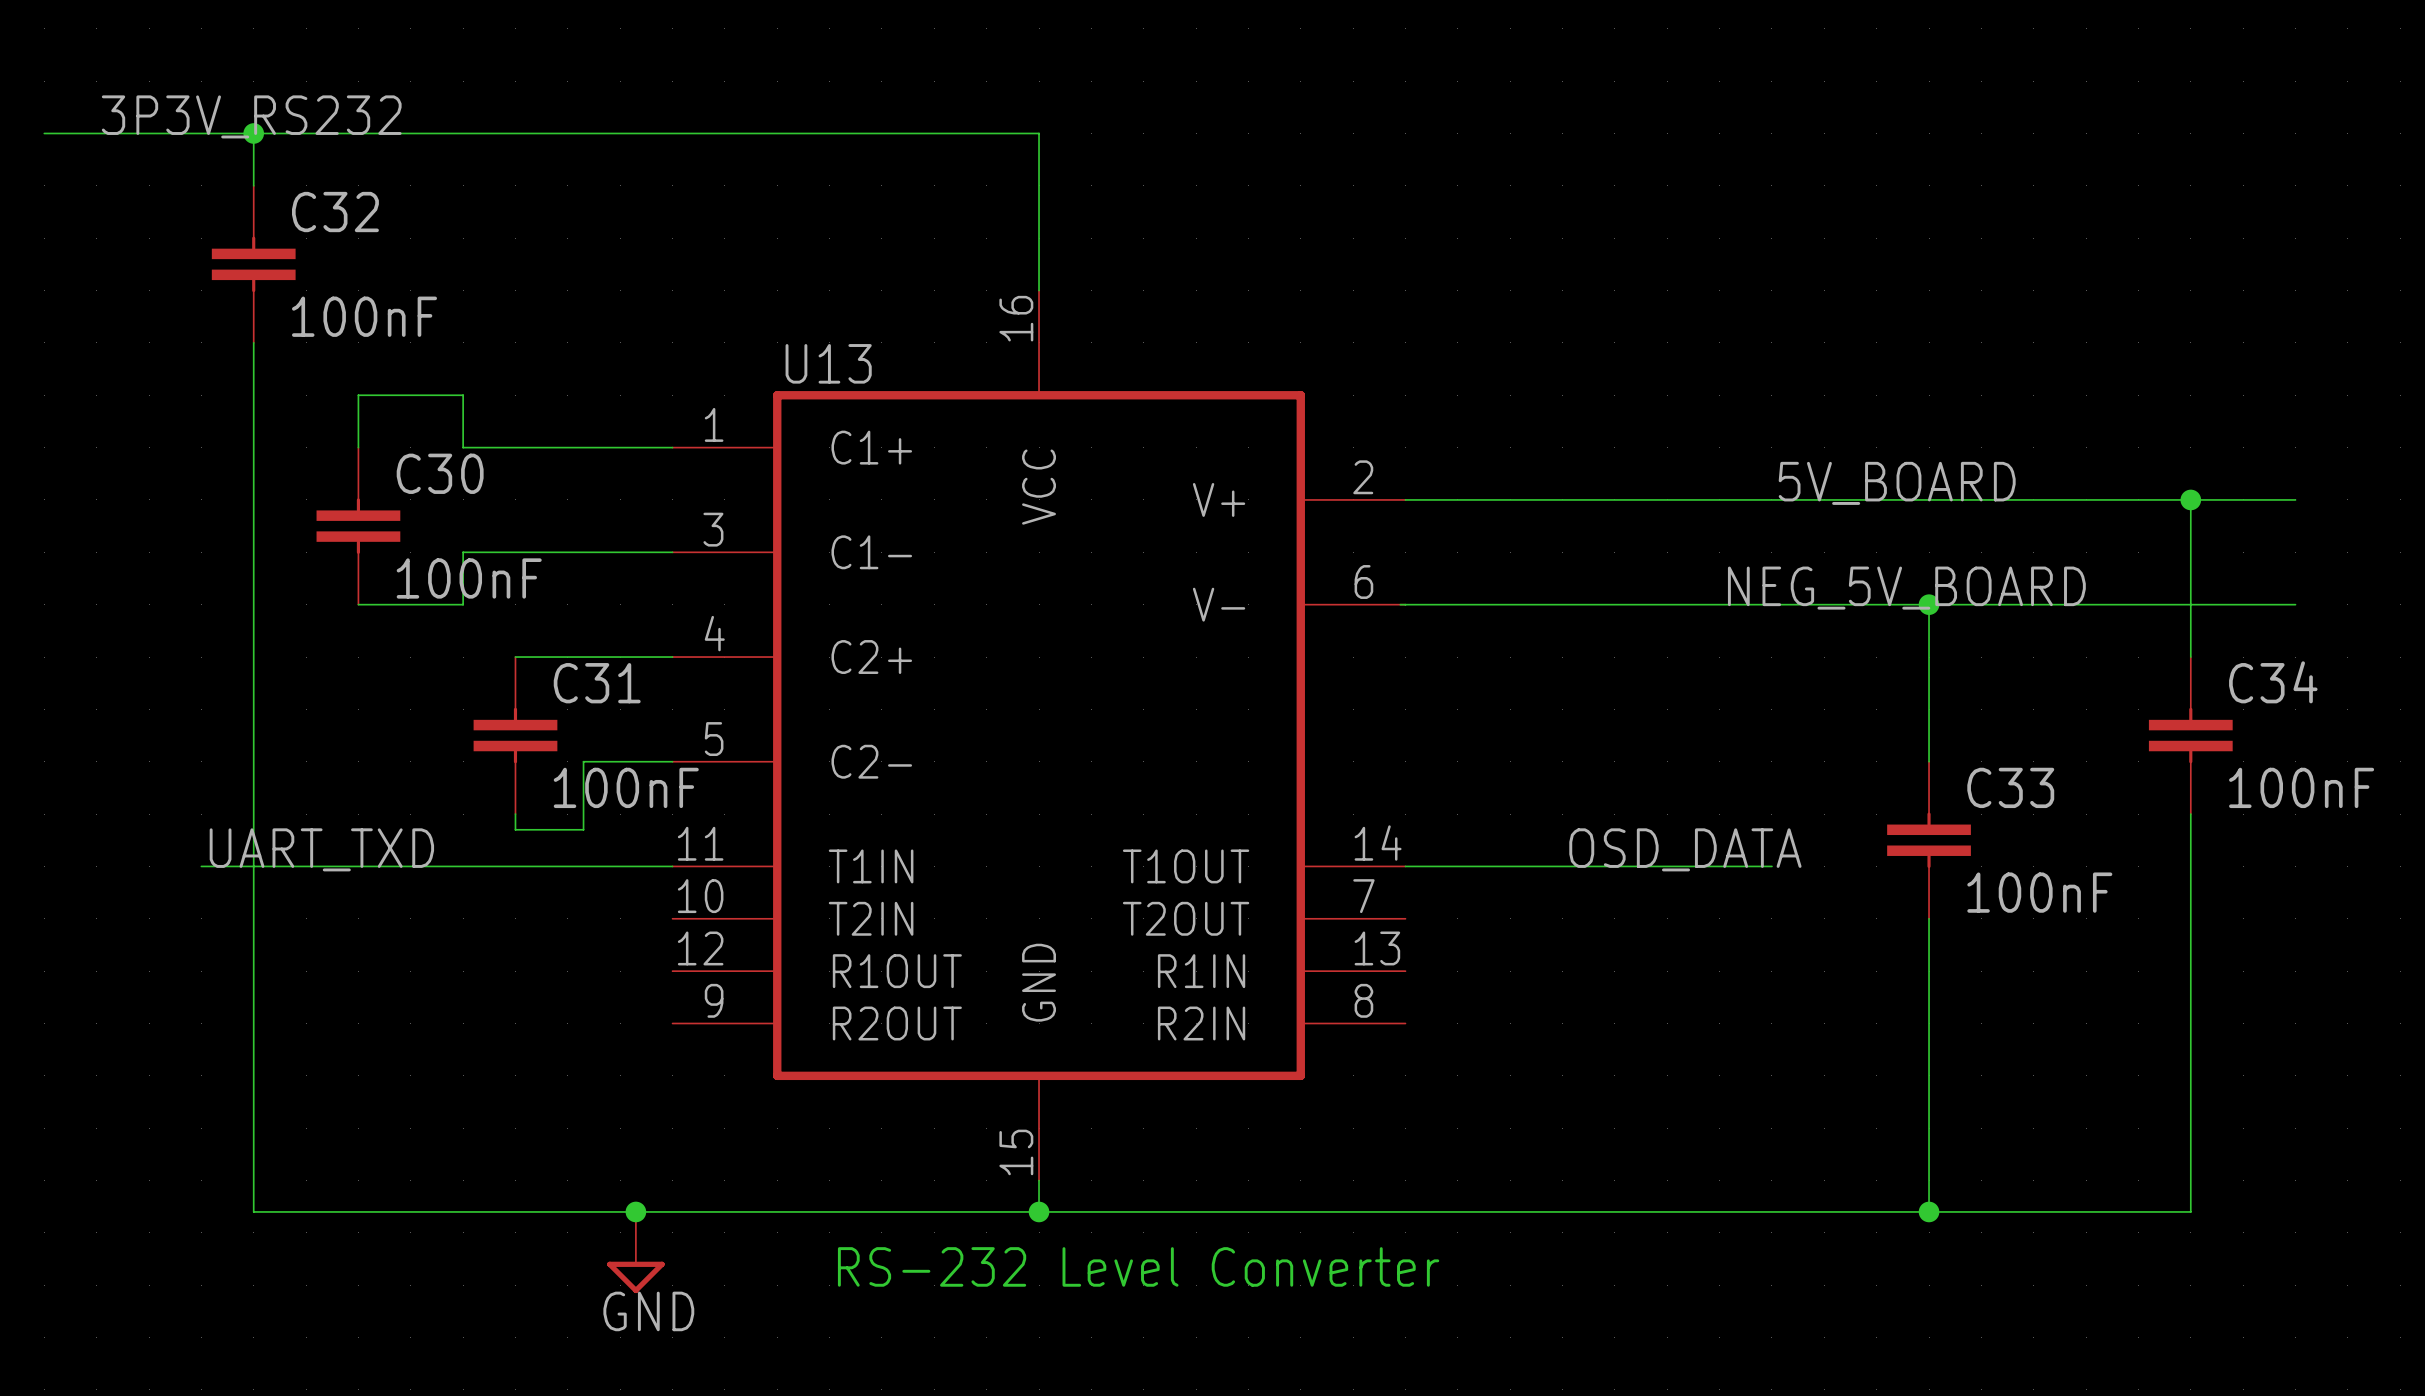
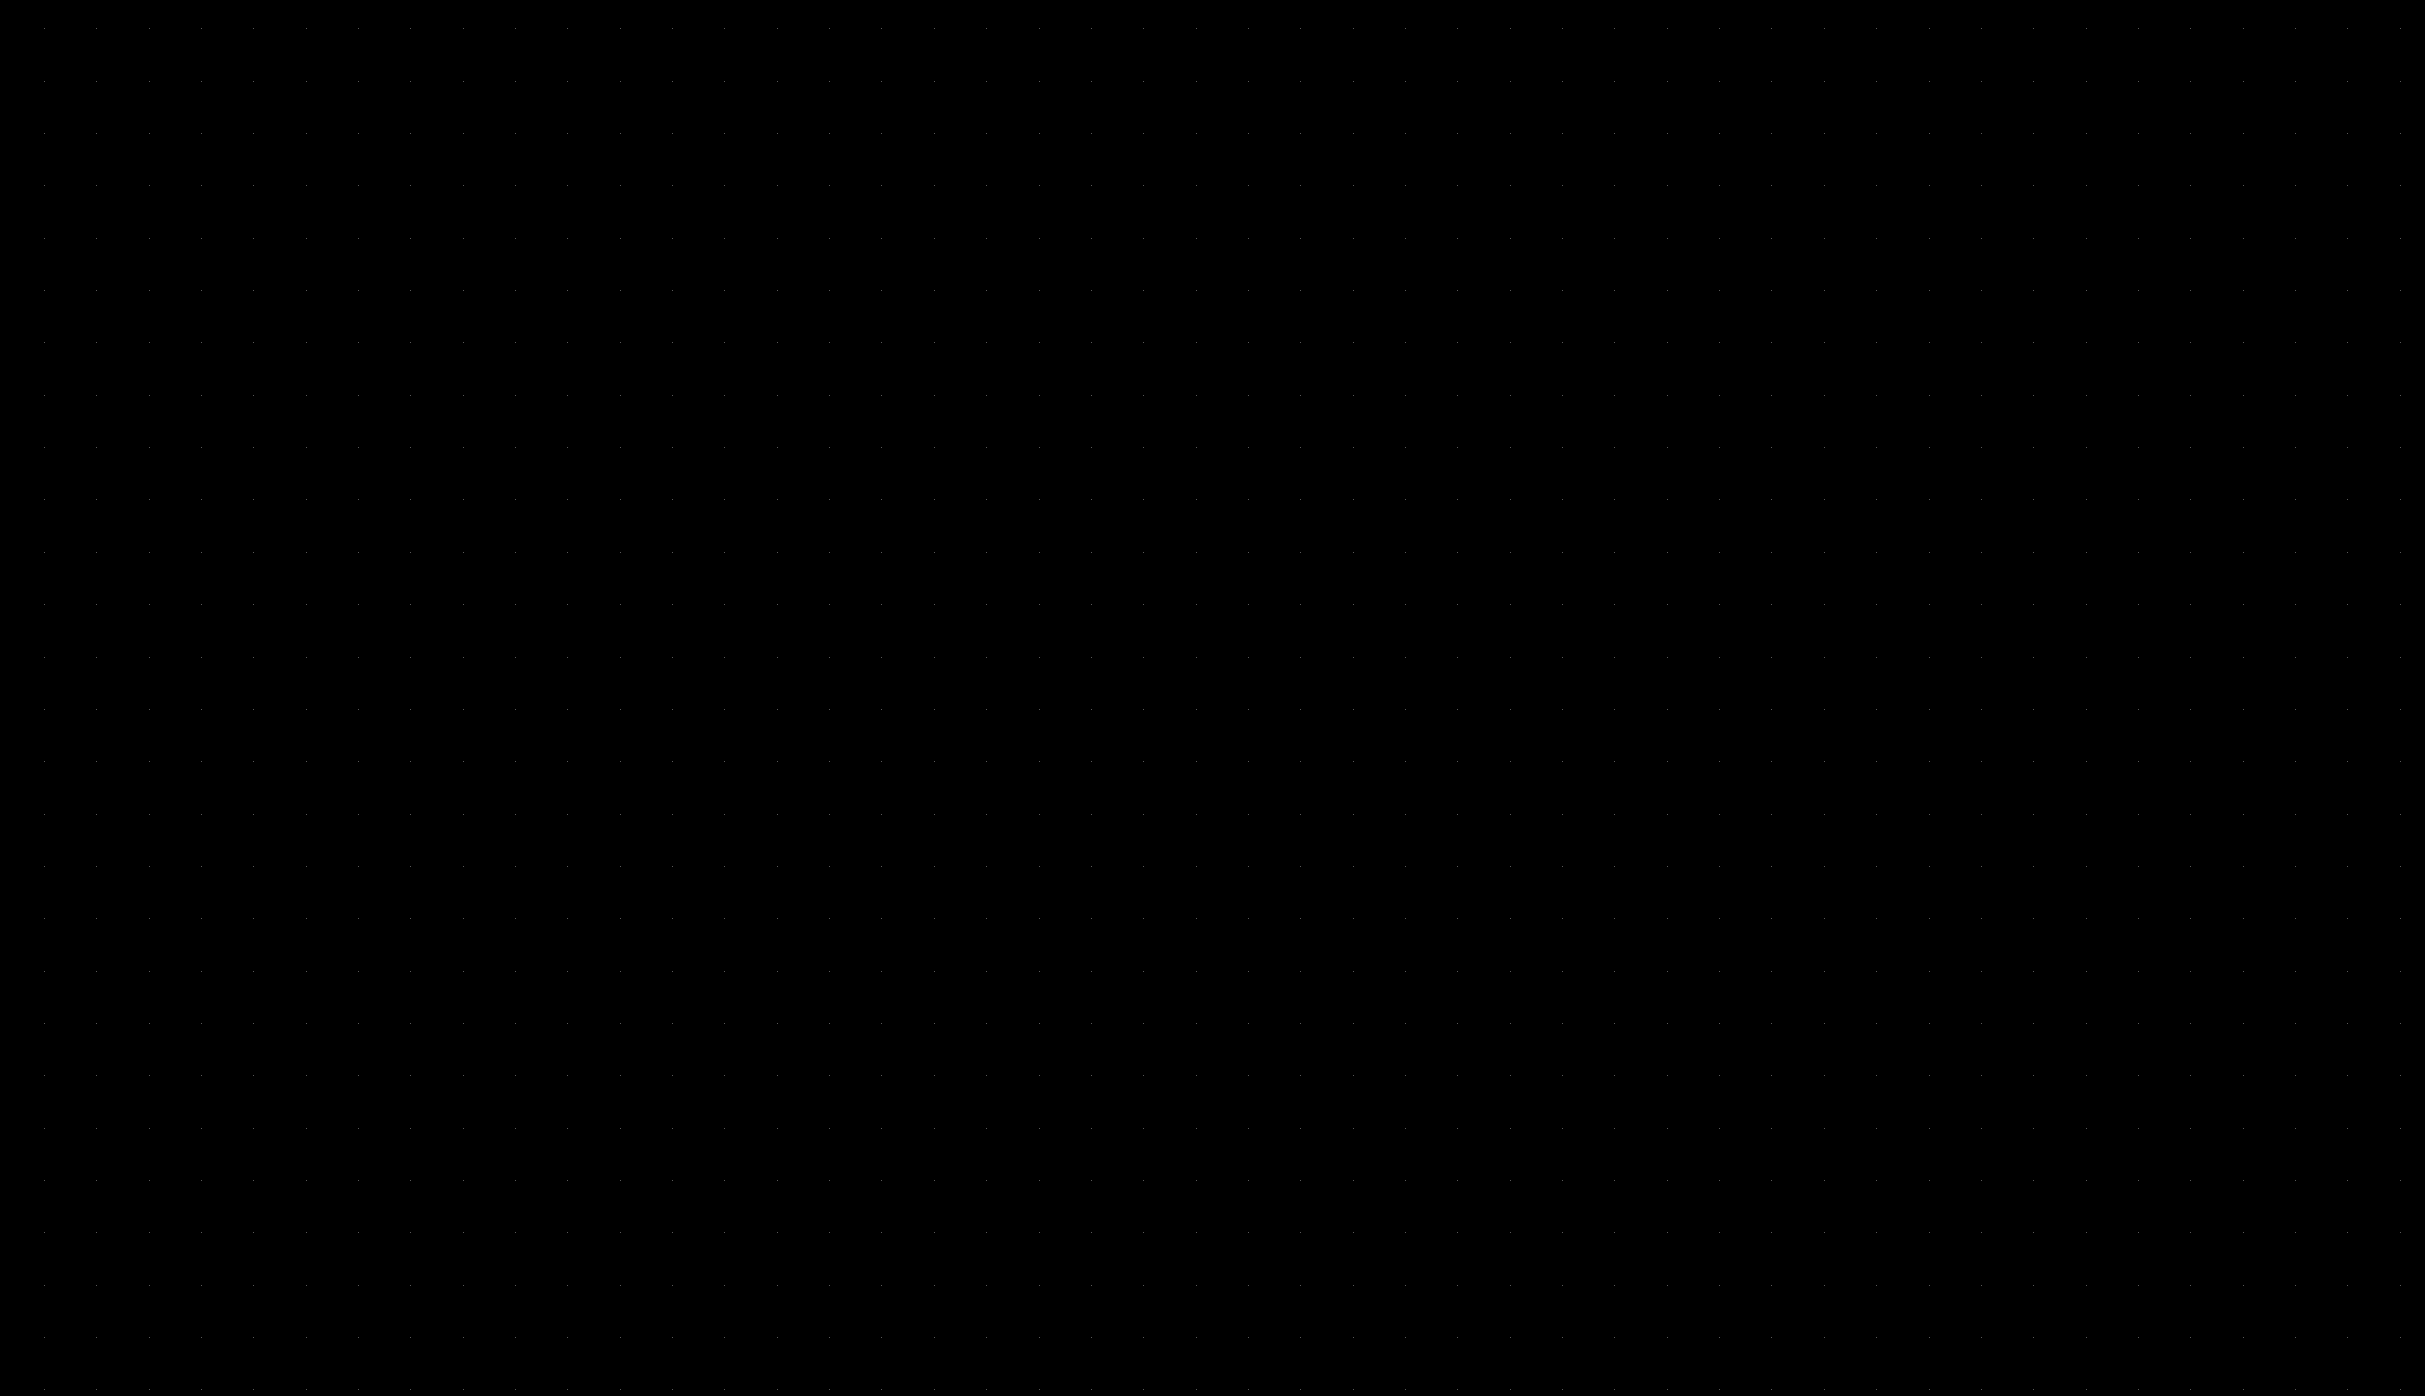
label: 3P3V_RS232 (251, 116) -> none
wire: (44, 133) (1039, 133) (1039, 290) -> none
wire: (253, 133) (253, 185) -> none
junction: (253, 133) -> none
C32: 100nF (253, 264) -> none
wire: (253, 342) (253, 1211) (2190, 1211) (2190, 814) -> none
wire: (358, 447) (358, 395) (463, 395) (463, 447) (672, 447) -> none
label: 5V_BOARD (1897, 483) -> none
wire: (1405, 499) (2295, 499) -> none
wire: (2190, 499) (2190, 657) -> none
junction: (2190, 499) -> none
C30: 100nF (358, 526) -> none
wire: (672, 552) (463, 552) (463, 604) (358, 604) -> none
label: NEG_5V_BOARD (1906, 588) -> none
wire: (1400, 604) (2295, 604) -> none
wire: (1929, 604) (1929, 761) -> none
junction: (1929, 604) -> none
wire: (515, 657) (672, 657) -> none
C31: 100nF (515, 735) -> none
U13: (1039, 735) -> none
C34: 100nF (2190, 735) -> none
wire: (672, 761) (583, 761) (583, 829) (515, 829) (515, 814) -> none
C33: 100nF (1929, 840) -> none
label: UART_TXD (321, 849) -> none
label: OSD_DATA (1685, 849) -> none
wire: (201, 866) (672, 866) -> none
wire: (1405, 866) (1771, 866) -> none
wire: (1929, 918) (1929, 1211) -> none
wire: (1039, 1180) (1039, 1211) -> none
junction: (635, 1211) -> none
junction: (1039, 1211) -> none
junction: (1929, 1211) -> none
power symbol: GND (635, 1252) -> none
text: RS-232 Level Converter (1138, 1266) -> none

